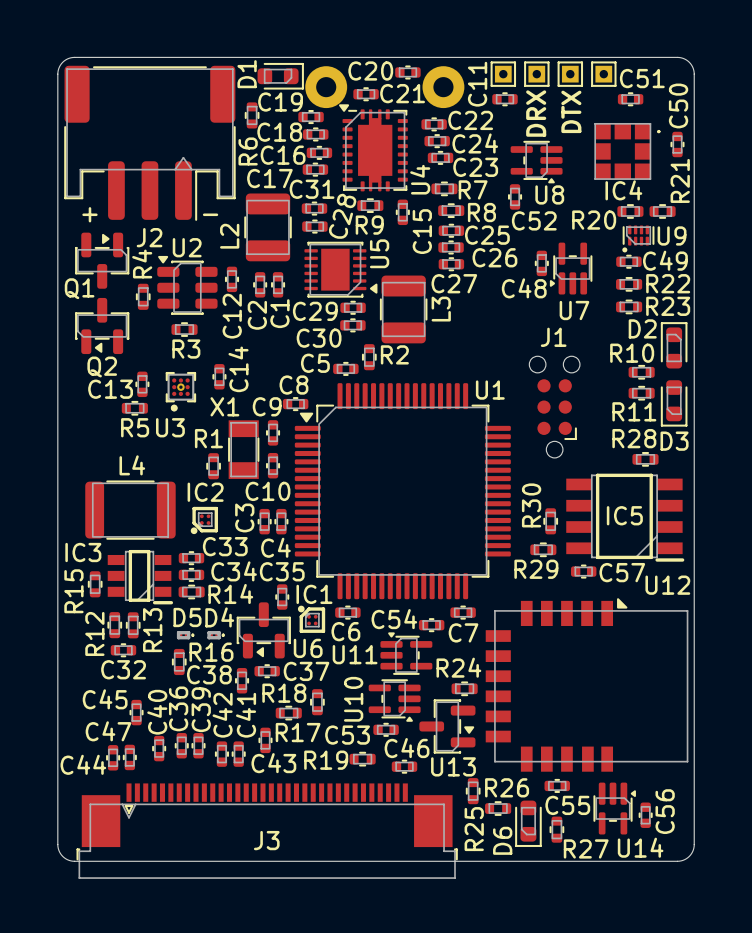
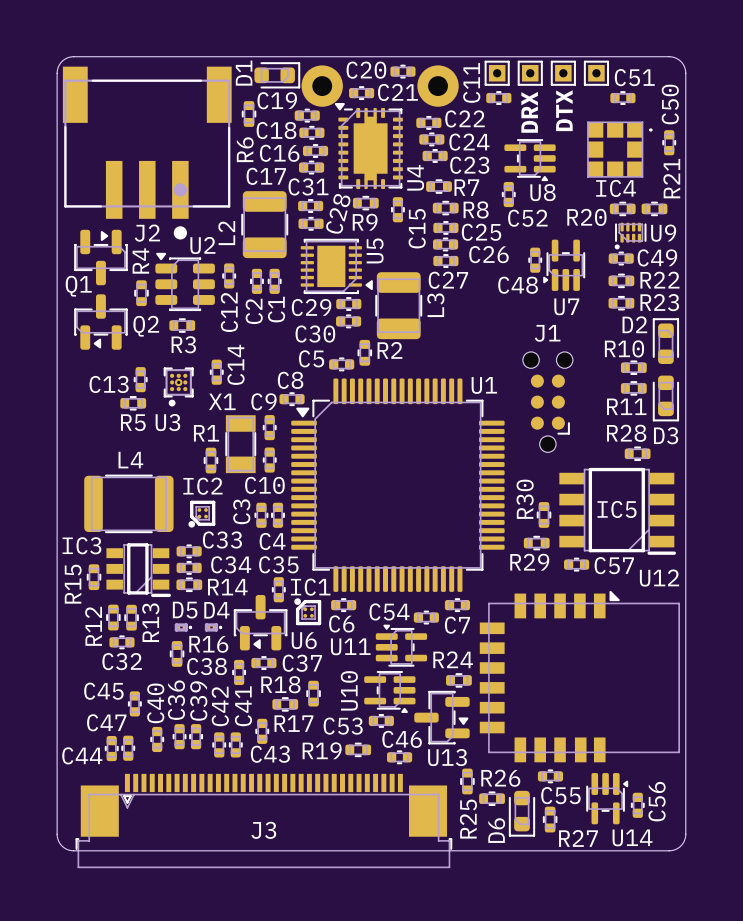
J2 footprint: [64, 65, 236, 221] -> [62, 66, 232, 240]
text: + (89, 214) -> none
text: - (210, 214) -> none
U2 name position: U2 (187, 247) -> U2 (202, 245)
Q2 name position: Q2 (102, 366) -> Q2 (146, 326)

